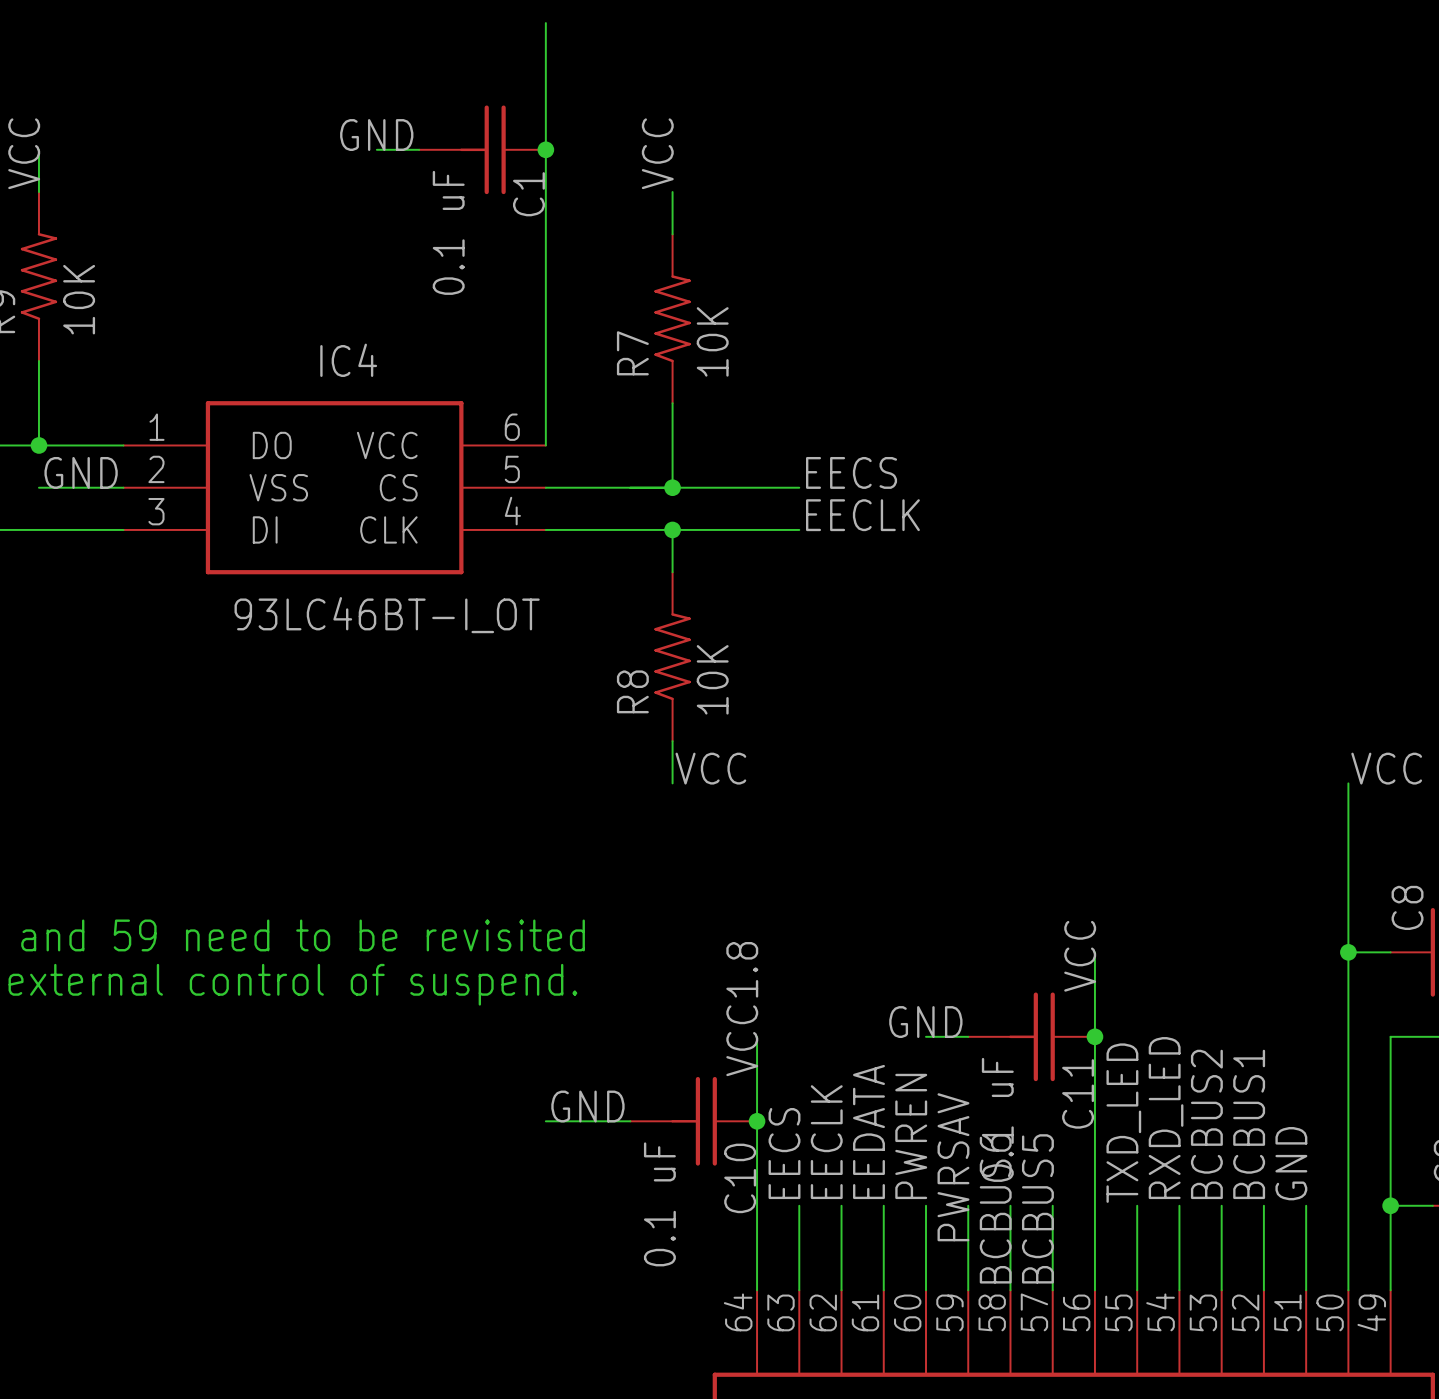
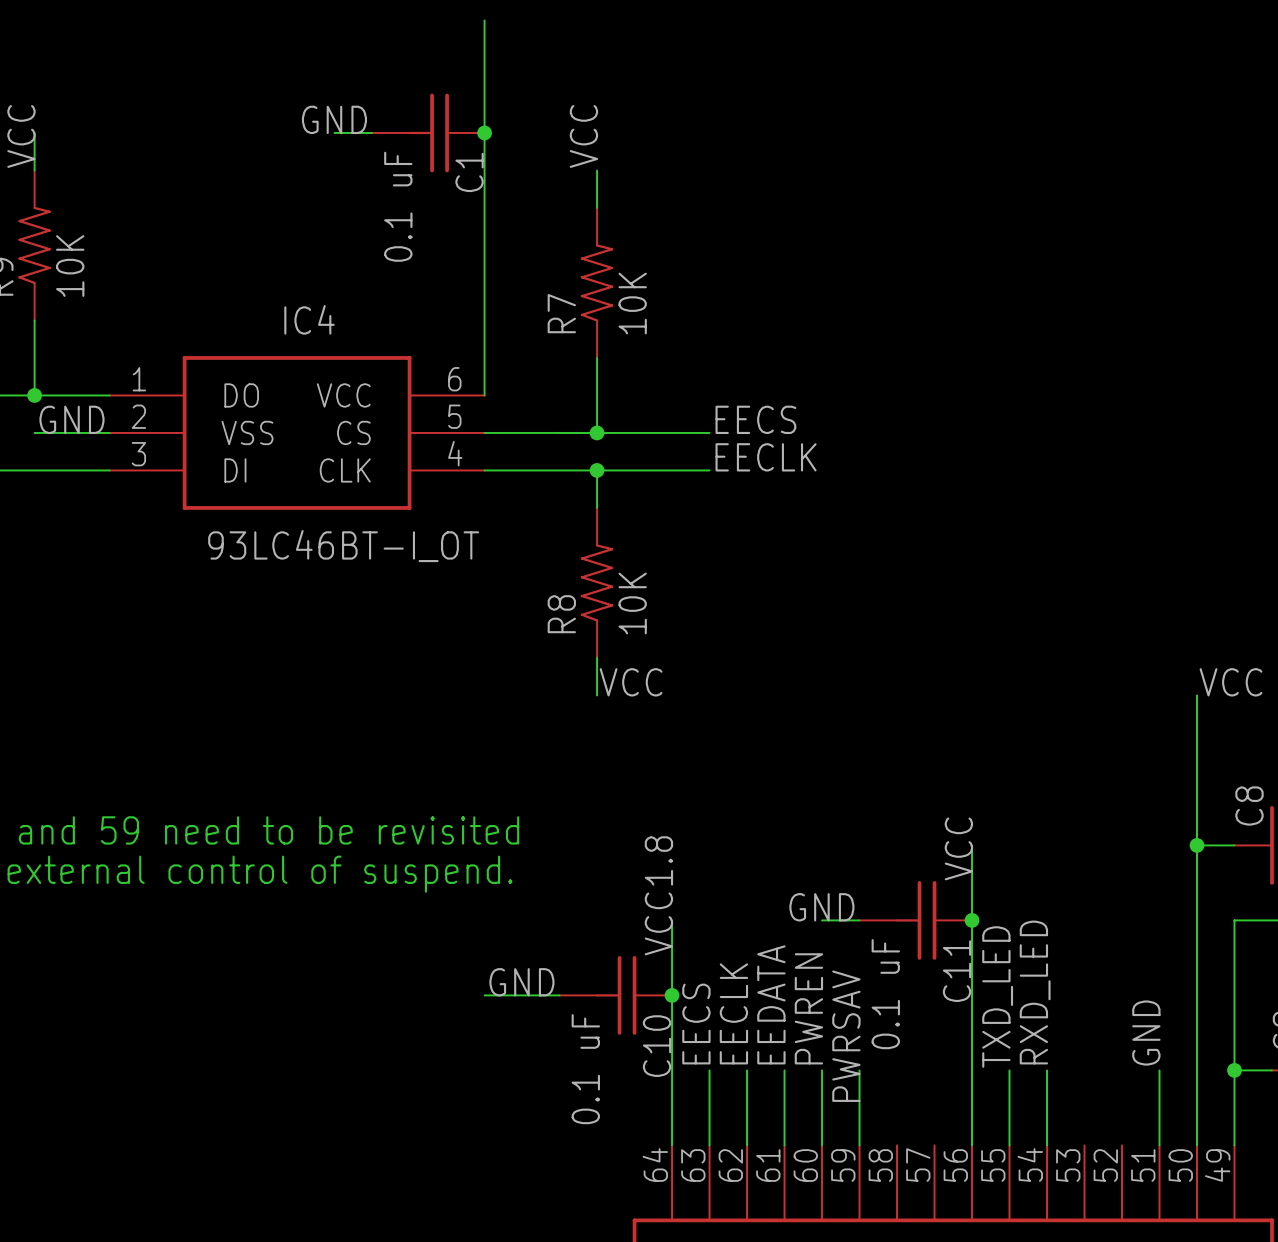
label: BCBUS2 (1206, 1124) -> none
label: BCBUS1 (1249, 1124) -> none
wire: (1010, 1205) (1010, 1290) -> none
wire: (1052, 1205) (1052, 1290) -> none
wire: (1221, 1205) (1221, 1290) -> none
wire: (1263, 1205) (1263, 1290) -> none
label: BCBUS6 (995, 1208) -> none
label: BCBUS5 (1037, 1208) -> none

